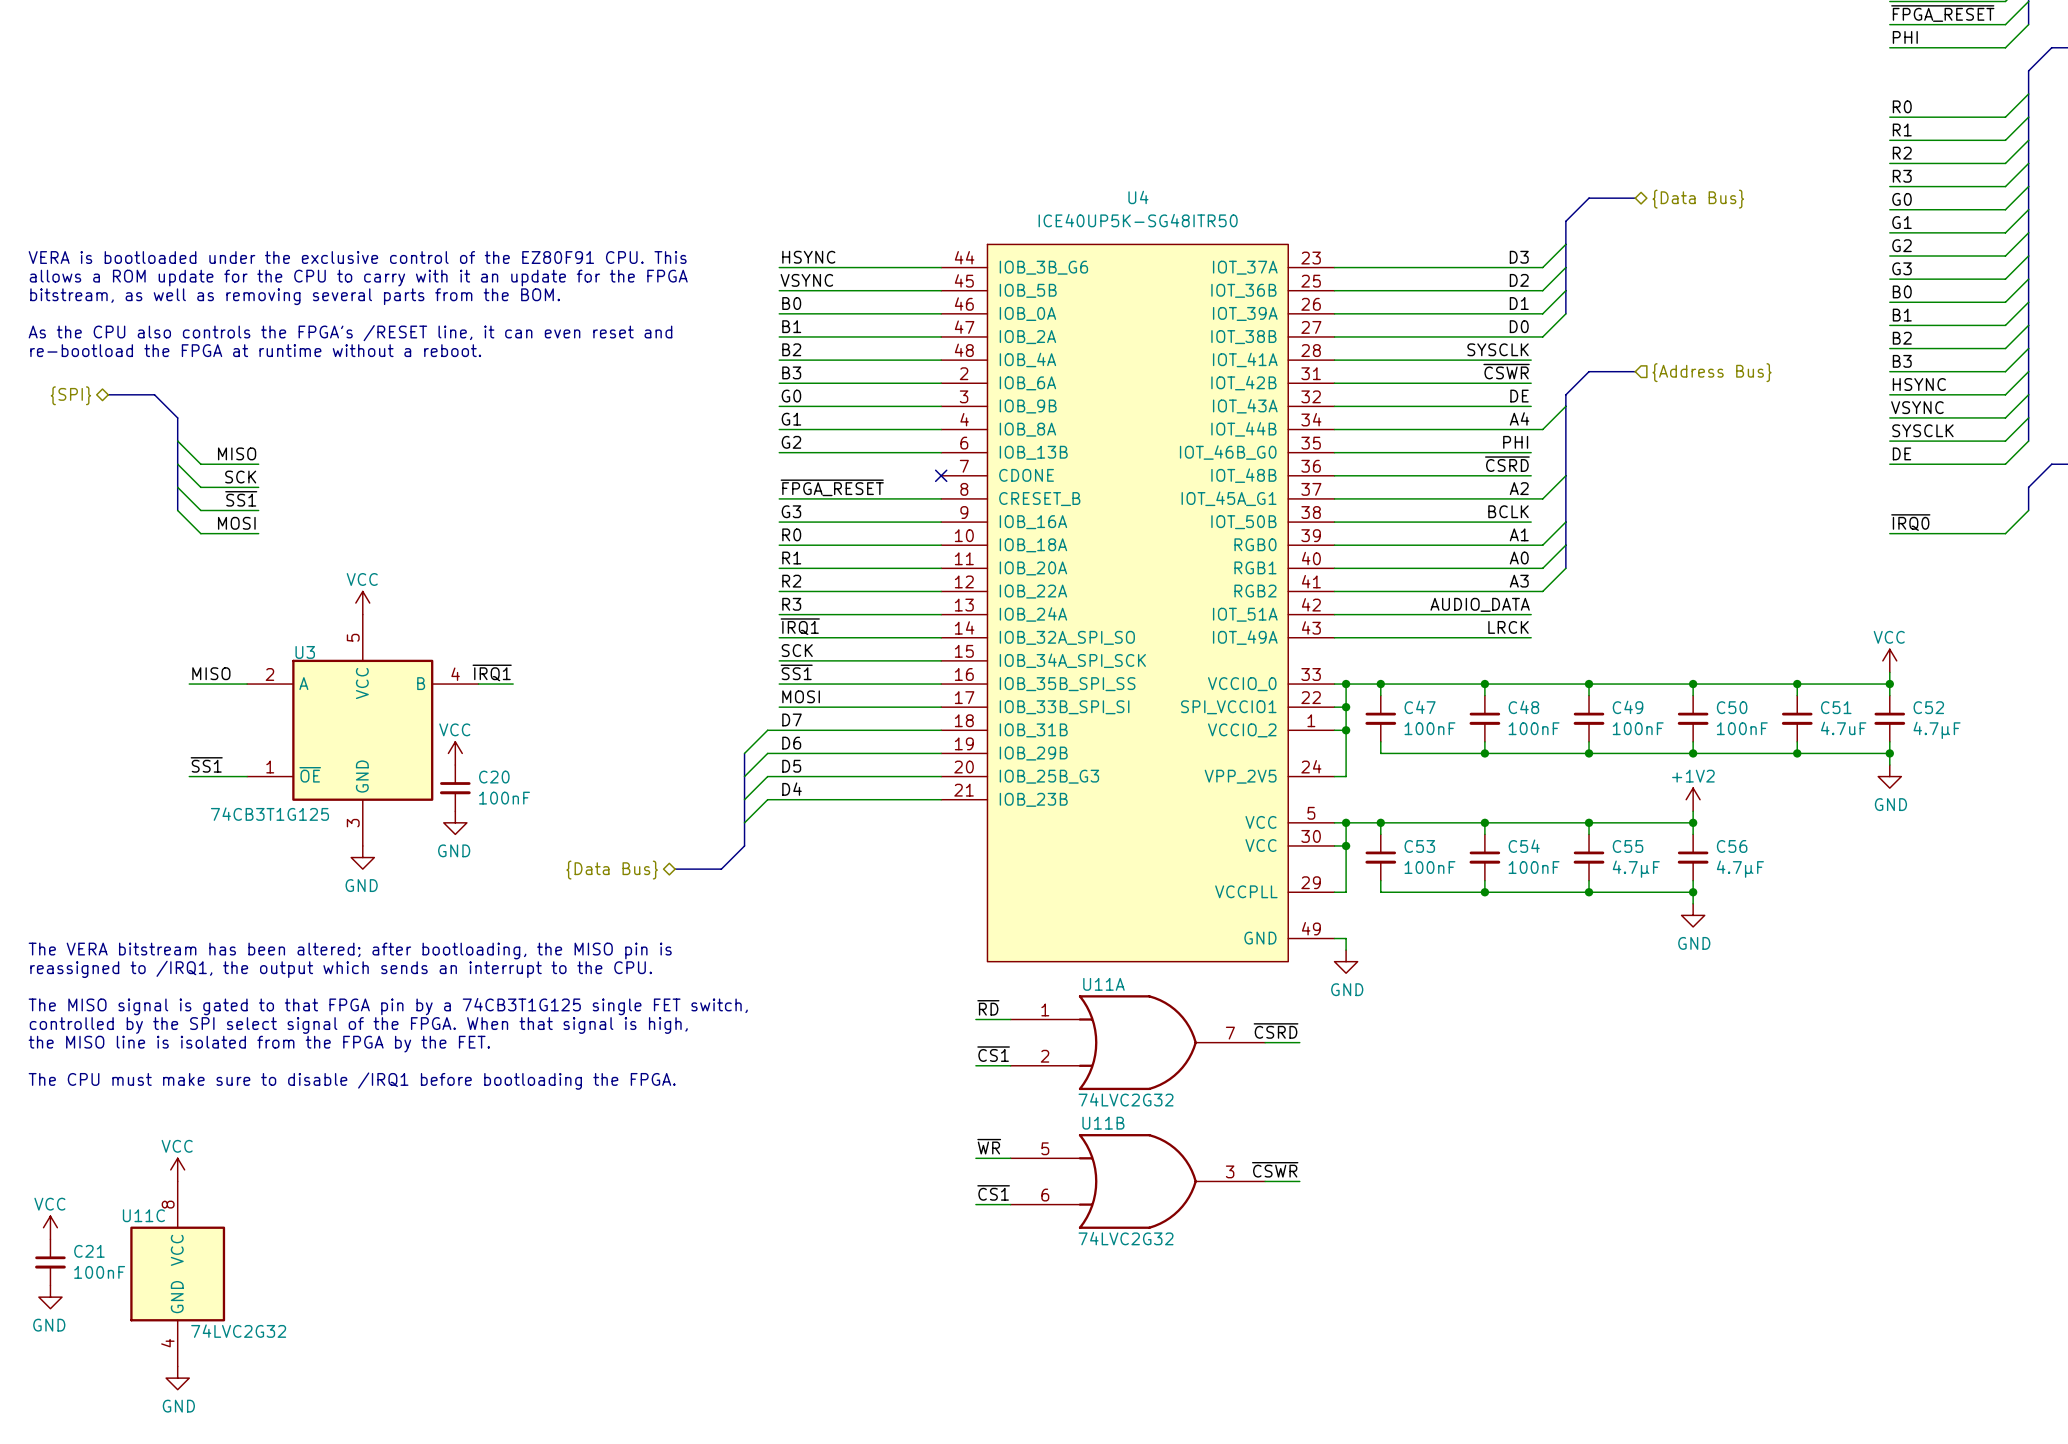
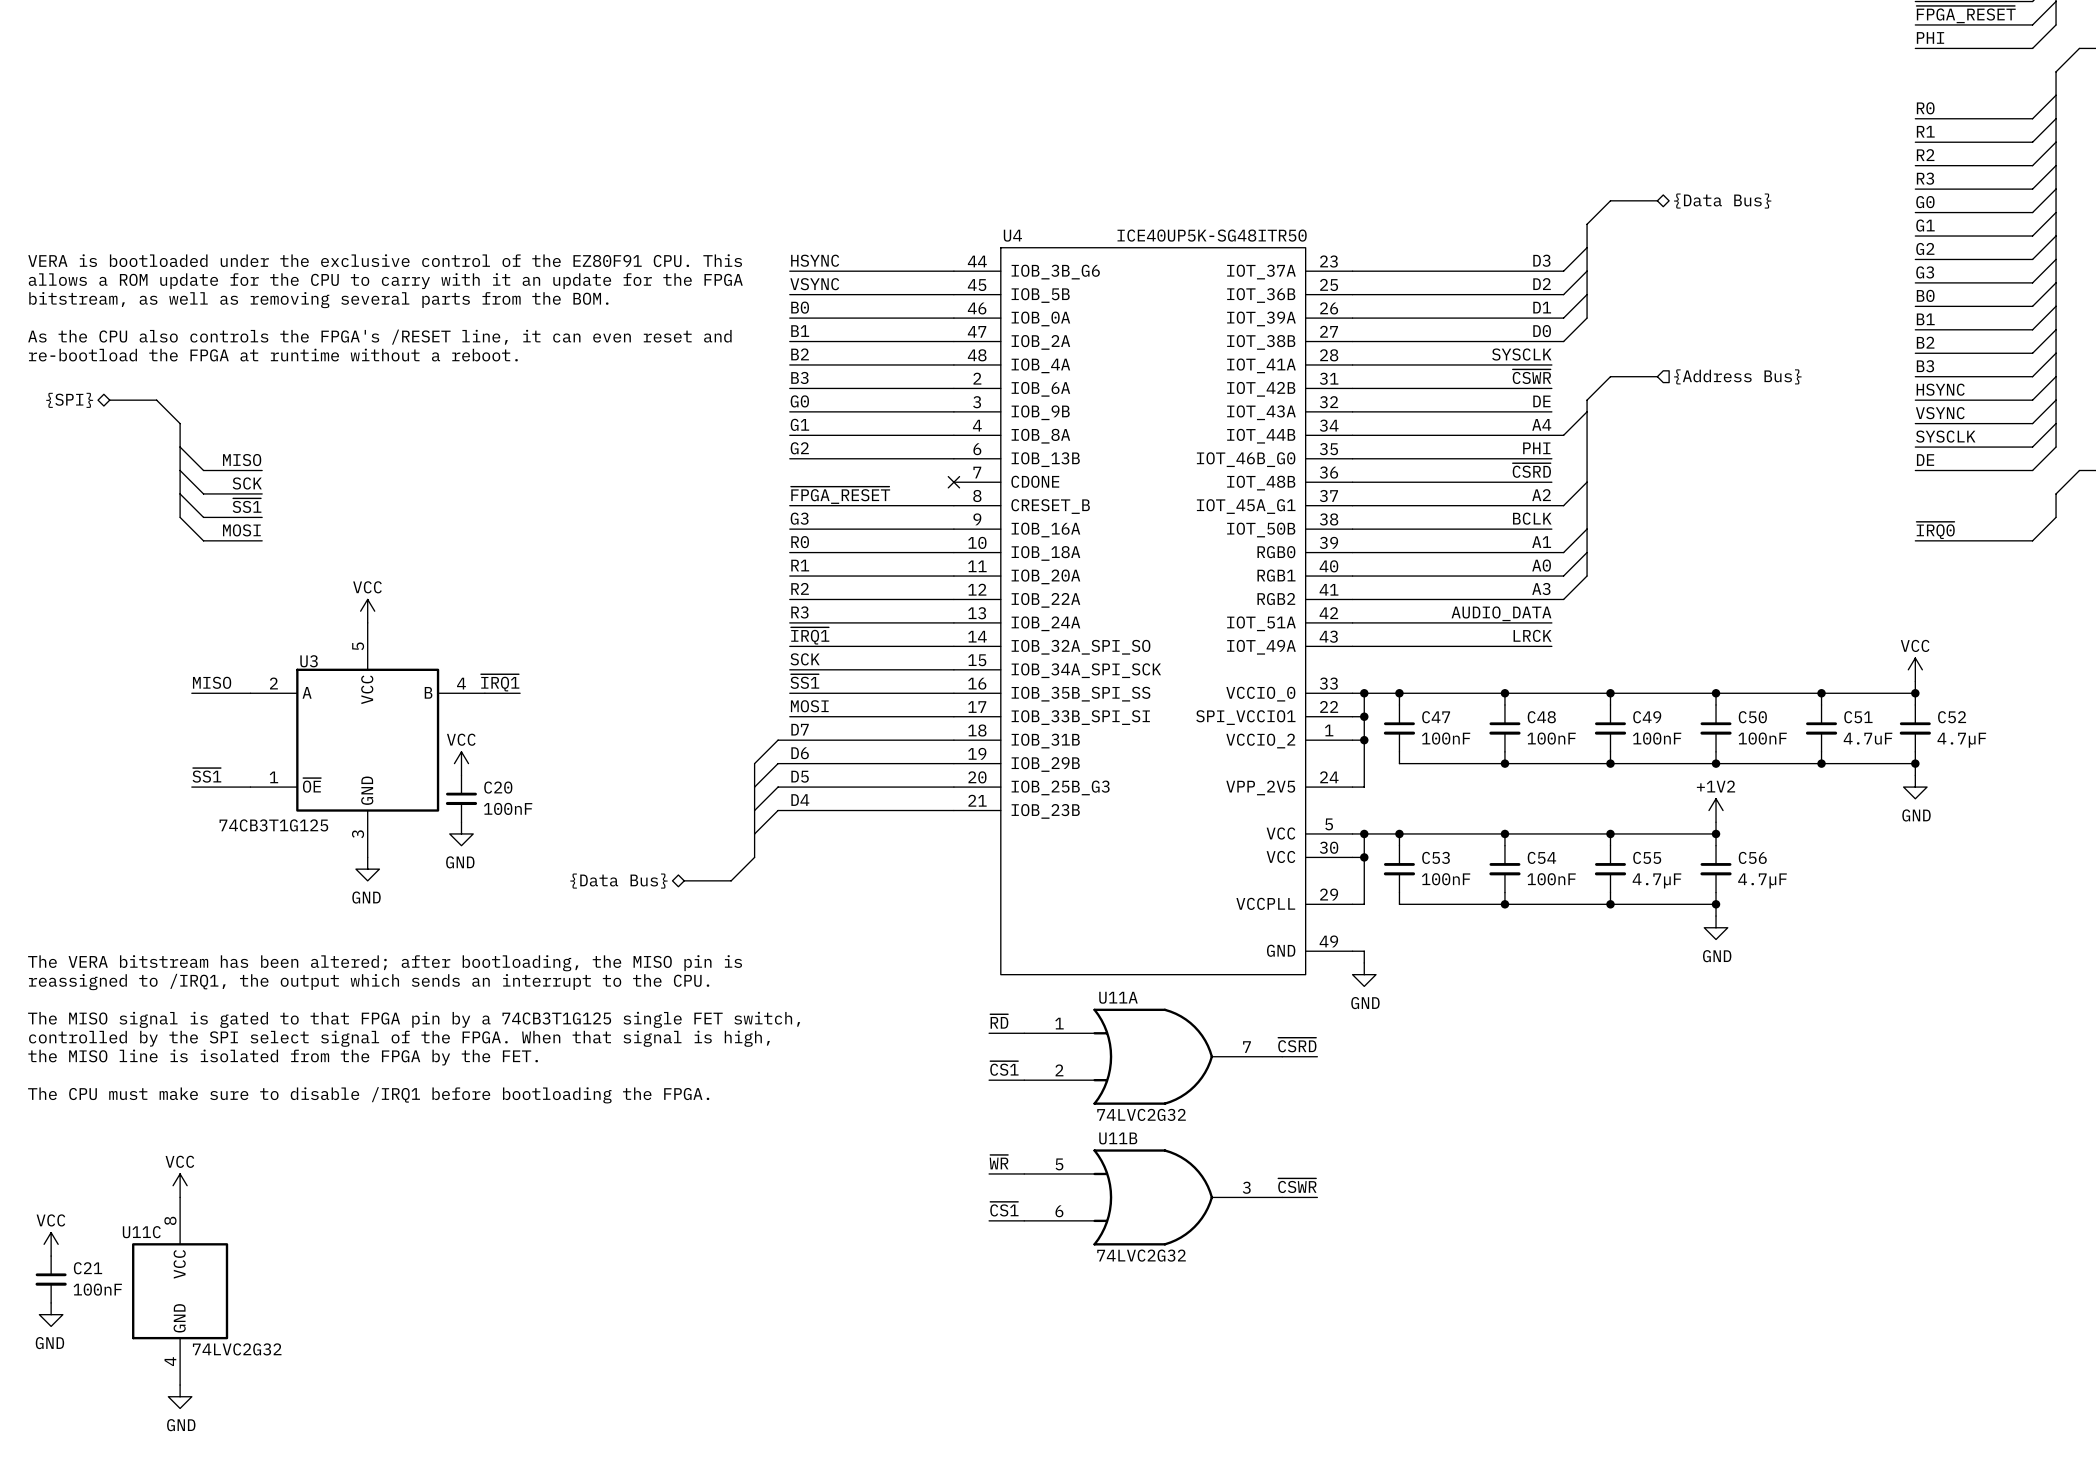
U4 name position: U4 (1138, 197) -> U4 (1012, 235)
U4 value position: ICE40UP5K-SG48ITR50 (1138, 220) -> ICE40UP5K-SG48ITR50 (1212, 235)

